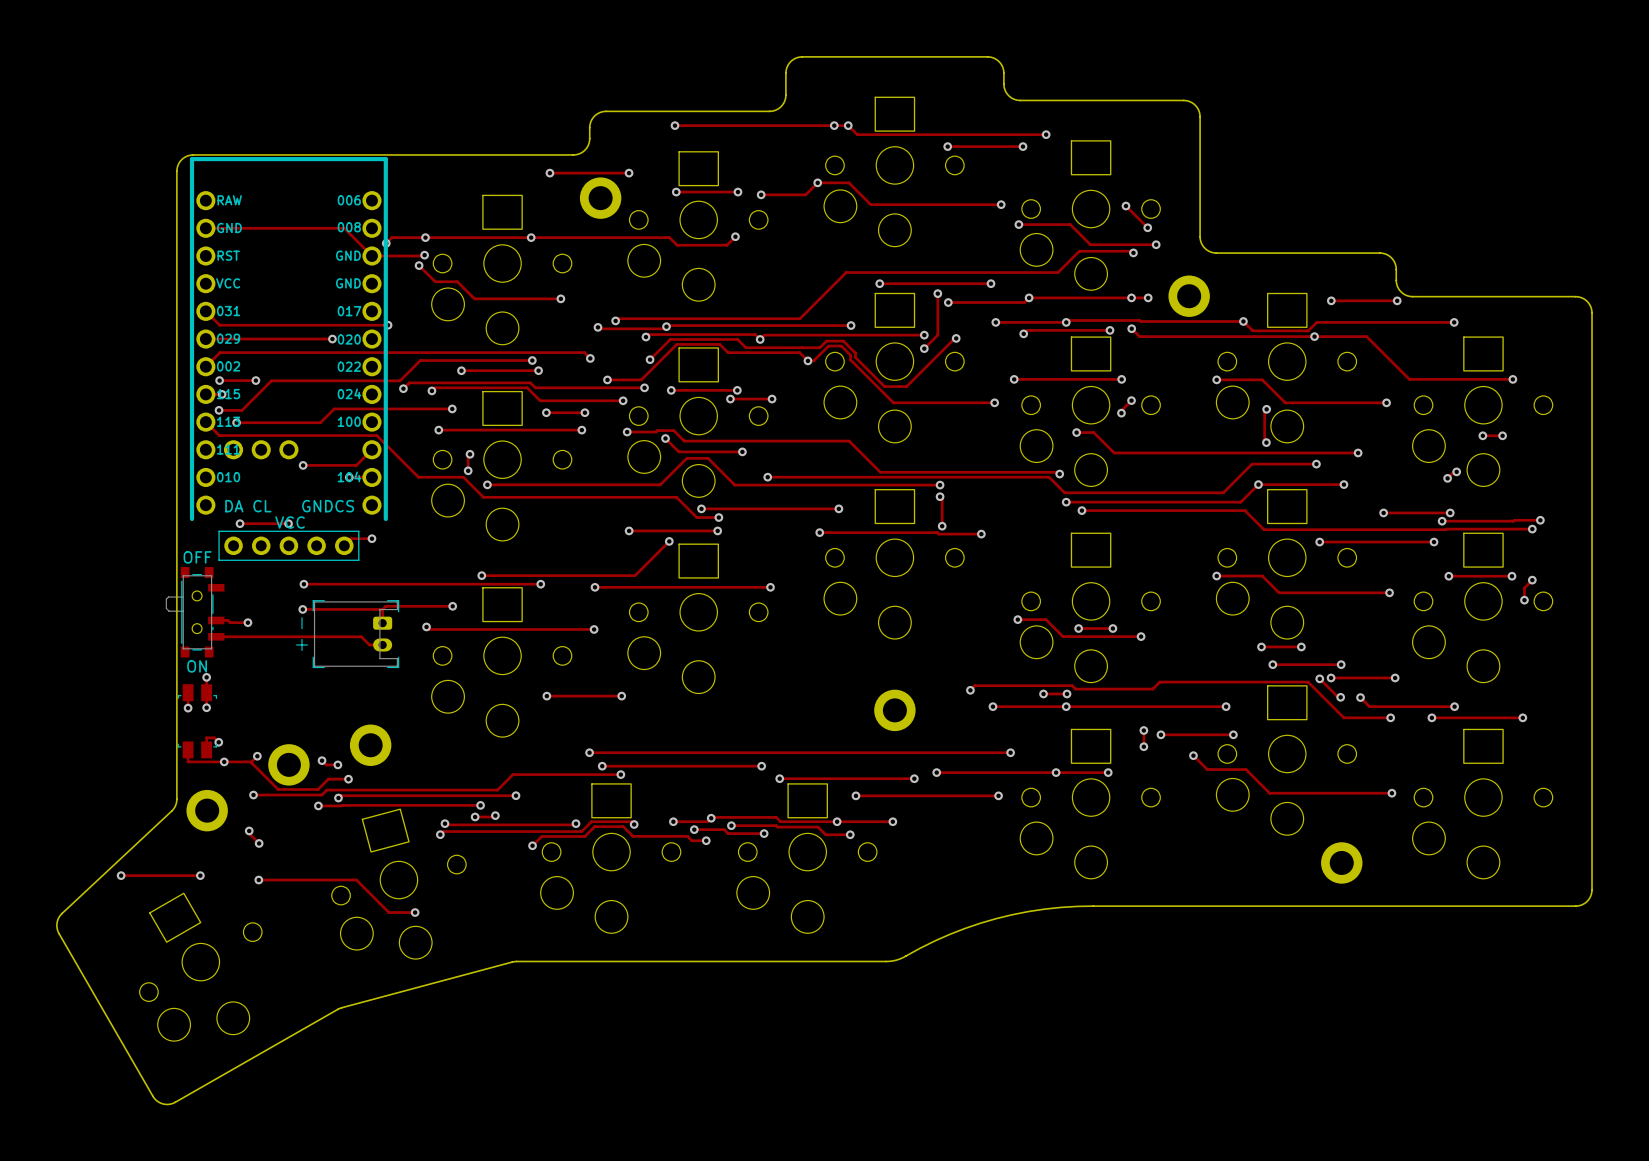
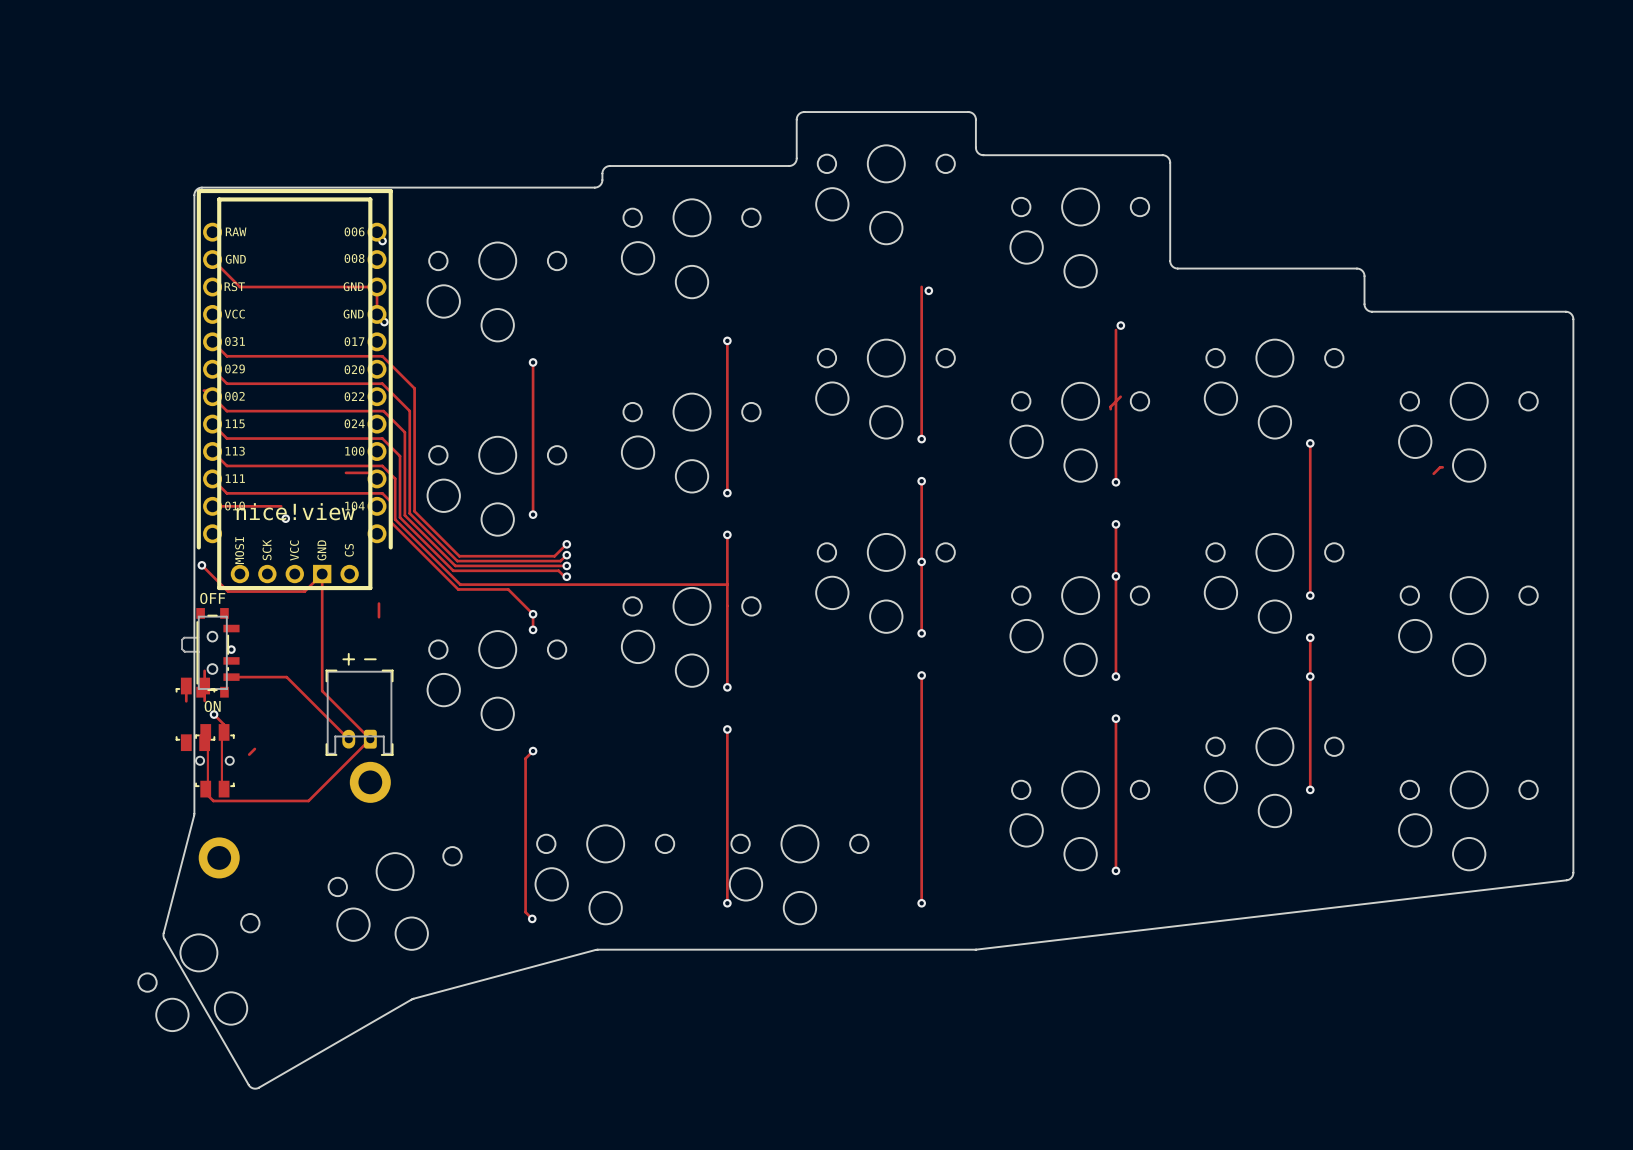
board edge: (802, 56) (989, 57) (995, 59) (1001, 65) (1005, 90) (1008, 95) (1016, 99) (1187, 101) (1195, 105) (1199, 114) (1200, 236) (1202, 244) (1208, 250) (1216, 253) (1382, 253) (1389, 256) (1394, 261) (1397, 286) (1402, 293) (1408, 296) (1575, 296) (1587, 301) (1592, 313) (1592, 889) (1589, 897) (1583, 903) (1575, 906) (1060, 907) (1028, 911) (980, 923) (935, 940) (899, 959) (889, 961) (514, 961) (339, 1008) (175, 1102) (167, 1104) (158, 1102) (152, 1096) (59, 933) (56, 924) (62, 913) (171, 811) (176, 802) (176, 171) (179, 163) (185, 157) (193, 154) (575, 154) (583, 151) (587, 146) (590, 121) (596, 114) (601, 111) (775, 110) (782, 104) (785, 99) (786, 71) (788, 65) (794, 59) (802, 56) -> (804, 112) (799, 113) (796, 117) (796, 159) (794, 163) (790, 165) (609, 166) (603, 170) (601, 184) (594, 187) (201, 187) (195, 191) (194, 813) (163, 935) (251, 1087) (259, 1087) (412, 999) (596, 949) (975, 949) (1566, 880) (1572, 876) (1573, 319) (1571, 313) (1565, 311) (1371, 311) (1364, 306) (1364, 275) (1358, 268) (1176, 268) (1170, 261) (1170, 162) (1165, 155) (982, 155) (976, 150) (975, 118) (970, 112) (804, 112)
part: (894, 114) -> none
track: (674, 125) (848, 125) (857, 134) (1046, 134) -> none
via: (674, 125) -> none
via: (834, 125) -> none
via: (848, 125) -> none
via: (1046, 134) -> none
track: (947, 146) (1023, 146) -> none
via: (947, 146) -> none
via: (1023, 146) -> none
part: (1091, 157) -> none
part: (698, 168) -> none
track: (549, 173) (629, 173) -> none
via: (549, 173) -> none
via: (629, 173) -> none
via: (817, 182) -> none
track: (676, 192) (737, 192) -> none
via: (676, 192) -> none
via: (737, 192) -> none
track: (761, 194) (805, 194) (817, 182) (848, 182) (870, 204) (1001, 204) -> none
via: (761, 194) -> none
part: (600, 198) -> none
via: (1001, 204) -> none
track: (1125, 206) (1147, 227) -> none
via: (1125, 206) -> none
part: (502, 212) -> none
track: (1018, 224) (1070, 224) (1090, 244) (1156, 244) -> none
via: (1018, 224) -> none
via: (1147, 227) -> none
track: (205, 228) (344, 228) (371, 256) (424, 255) -> none
track: (735, 236) (726, 245) (677, 245) (669, 237) (391, 237) (386, 243) -> none
via: (735, 236) -> none
via: (425, 237) -> none
via: (531, 237) -> none
via: (1156, 244) -> none
track: (1133, 252) (1131, 251) (1079, 251) (1058, 272) (846, 272) (799, 318) (617, 318) (615, 320) -> none
via: (1133, 252) -> none
via: (424, 255) -> none
track: none -> (212, 259) (239, 287) (377, 287) (377, 314)
track: (419, 265) (435, 281) (457, 281) (474, 298) (560, 298) -> none
via: (419, 265) -> none
track: (879, 283) (990, 283) -> none
via: (879, 283) -> none
via: (990, 283) -> none
track: none -> (921, 286) (921, 439)
track: (937, 293) (937, 335) (924, 348) -> none
part: (1189, 296) -> none
via: (1029, 297) -> none
via: (1131, 297) -> none
track: (1148, 297) (1029, 297) (1024, 302) (948, 302) -> none
via: (1148, 297) -> none
via: (560, 298) -> none
track: (1331, 300) (1397, 300) -> none
via: (1331, 300) -> none
via: (1397, 300) -> none
via: (948, 302) -> none
part: (894, 310) -> none
part: (1287, 310) -> none
track: (205, 311) (219, 325) (388, 325) -> none
via: (615, 320) -> none
via: (1243, 321) -> none
track: (995, 322) (1066, 322) (1068, 320) (1243, 321) (1252, 330) (1308, 330) (1316, 322) (1454, 322) -> none
via: (995, 322) -> none
via: (1066, 322) -> none
via: (1454, 322) -> none
track: (851, 325) (667, 325) (664, 328) (597, 327) -> none
via: (851, 325) -> none
via: (666, 326) -> none
via: (597, 327) -> none
track: (1131, 328) (1139, 336) (1366, 336) (1409, 379) (1512, 379) -> none
track: (1110, 330) (1027, 330) (1023, 333) -> none
via: (1110, 330) -> none
via: (1023, 333) -> none
track: none -> (1115, 330) (1115, 482)
track: (924, 335) (764, 335) (760, 339) (755, 334) (648, 334) (645, 337) -> none
via: (924, 335) -> none
via: (1314, 336) -> none
via: (645, 337) -> none
track: (956, 338) (906, 386) (884, 386) (855, 357) (855, 353) (843, 341) (826, 341) (819, 347) (745, 347) (737, 339) (670, 339) (650, 359) -> none
via: (956, 338) -> none
track: (205, 339) (332, 339) -> none
part: (288, 339) -> none
via: (332, 339) -> none
via: (760, 339) -> none
track: none -> (727, 340) (727, 493)
via: none -> (727, 340)
track: none -> (212, 341) (226, 356) (382, 356) (414, 388) (414, 511) (459, 556) (554, 556) (566, 544)
via: (924, 348) -> none
part: (1091, 353) -> none
part: (1483, 353) -> none
track: (590, 358) (584, 352) (220, 352) (205, 366) -> none
via: (590, 358) -> none
via: (650, 359) -> none
track: (532, 360) (420, 360) (400, 380) (271, 380) (241, 410) (219, 410) -> none
via: (532, 360) -> none
via: (807, 360) -> none
part: (698, 364) -> none
track: none -> (533, 362) (533, 514)
via: none -> (533, 362)
track: (461, 370) (538, 370) -> none
via: (461, 370) -> none
via: (538, 370) -> none
track: none -> (212, 369) (226, 383) (382, 383) (409, 411) (409, 513) (457, 561) (560, 561) (566, 555)
part: none -> (294, 369)
track: (607, 379) (641, 379) (676, 344) (719, 344) (728, 352) (799, 352) (807, 360) (813, 360) (828, 346) (841, 346) (850, 355) (850, 359) (893, 402) (994, 402) -> none
via: (607, 379) -> none
track: (1014, 379) (1121, 379) -> none
via: (1014, 379) -> none
via: (1121, 379) -> none
track: (1216, 379) (1262, 379) (1285, 402) (1386, 402) -> none
via: (1216, 379) -> none
via: (1512, 379) -> none
track: (219, 380) (255, 380) -> none
via: (219, 380) -> none
via: (255, 380) -> none
track: (644, 387) (535, 387) (530, 382) (409, 382) (403, 388) -> none
via: (644, 387) -> none
via: (403, 388) -> none
track: (431, 390) (434, 387) (527, 387) (540, 400) (623, 400) -> none
via: (431, 390) -> none
track: (671, 390) (737, 390) -> none
via: (671, 390) -> none
via: (737, 390) -> none
via: (222, 394) -> none
part: none -> (294, 393)
track: (730, 399) (772, 399) -> none
via: (730, 399) -> none
via: (772, 399) -> none
track: none -> (212, 396) (226, 411) (383, 411) (404, 432) (404, 515) (455, 565) (566, 565)
via: (623, 400) -> none
via: (1131, 400) -> none
via: (994, 402) -> none
via: (1386, 402) -> none
track: (452, 408) (334, 408) (320, 422) (236, 422) -> none
via: (452, 408) -> none
part: (502, 408) -> none
track: (1266, 409) (1264, 411) (1264, 440) (1266, 442) -> none
via: (1266, 409) -> none
via: (219, 410) -> none
track: (546, 412) (584, 412) -> none
via: (546, 412) -> none
via: (584, 412) -> none
via: (1121, 413) -> none
track: (205, 422) (219, 435) (376, 435) (418, 477) (463, 477) (483, 497) (676, 497) (696, 517) (718, 517) -> none
via: (236, 422) -> none
track: none -> (212, 424) (226, 438) (382, 438) (400, 456) (400, 517) (453, 570) (558, 570) (566, 576)
track: (438, 430) (581, 430) -> none
via: (438, 430) -> none
via: (581, 430) -> none
track: (627, 432) (673, 430) (684, 441) (849, 441) (880, 472) (1057, 472) (1059, 474) -> none
via: (627, 432) -> none
track: (1076, 432) (1093, 432) (1114, 452) (1358, 452) -> none
via: (1076, 432) -> none
track: (1482, 435) (1502, 435) -> none
via: (1482, 435) -> none
via: (1502, 435) -> none
track: (665, 438) (678, 451) (742, 451) -> none
via: (665, 438) -> none
via: (1266, 442) -> none
via: none -> (921, 439)
track: none -> (1310, 443) (1310, 595)
track: (371, 449) (356, 465) (303, 465) -> none
via: (742, 451) -> none
via: (1358, 452) -> none
track: (470, 454) (468, 456) (468, 470) -> none
via: (470, 454) -> none
track: none -> (212, 451) (226, 465) (382, 465) (395, 478) (395, 519) (460, 584) (727, 584)
track: (1316, 464) (1252, 464) (1223, 492) (1064, 492) (1049, 477) (767, 477) -> none
via position: (1316, 464) -> (1310, 443)
via: (303, 465) -> none
via: (468, 470) -> none
via: (1456, 471) -> none
via: (1059, 474) -> none
via: (349, 477) -> none
via: (767, 477) -> none
via: (1447, 478) -> none
track: none -> (212, 478) (226, 493) (382, 493) (390, 501) (390, 521) (458, 589) (508, 589) (533, 614) (533, 629)
track: (487, 484) (660, 484) (686, 458) (708, 458) (734, 485) (940, 485) -> none
via: (487, 484) -> none
via: (1258, 484) -> none
track: (1343, 484) (1258, 484) (1240, 502) (1066, 502) -> none
via: (1343, 484) -> none
track: none -> (921, 481) (921, 633)
via: none -> (921, 481)
via: (940, 485) -> none
via: none -> (1115, 482)
track: (940, 496) (942, 498) (942, 526) -> none
via: (940, 496) -> none
via: none -> (727, 493)
via: (1066, 502) -> none
part: (894, 506) -> none
part: (1287, 506) -> none
track: (701, 508) (838, 508) -> none
via: (701, 508) -> none
via: (838, 508) -> none
track: (1081, 510) (1244, 510) (1264, 529) (1532, 529) -> none
via: (1081, 510) -> none
track: none -> (212, 506) (281, 506)
track: (1383, 512) (1450, 512) -> none
via: (1383, 512) -> none
via: (1450, 512) -> none
via: (718, 517) -> none
via: none -> (533, 514)
track: (1540, 520) (1442, 521) -> none
via: (1540, 520) -> none
via: (1442, 521) -> none
track: (240, 523) (288, 523) -> none
via: (240, 523) -> none
via: (942, 526) -> none
track: none -> (1115, 524) (1115, 676)
via: none -> (1115, 524)
via: (1532, 529) -> none
track: (629, 530) (717, 530) -> none
via: (629, 530) -> none
via: (717, 530) -> none
track: (819, 532) (981, 534) -> none
via: (819, 532) -> none
via: (981, 534) -> none
track: (371, 538) (351, 538) (344, 545) -> none
via: (371, 538) -> none
track: none -> (727, 534) (727, 687)
via: none -> (727, 534)
track: (669, 541) (635, 575) (481, 575) -> none
via: (669, 541) -> none
track: (1319, 542) (1434, 542) -> none
via: (1319, 542) -> none
via: (1434, 542) -> none
part: (288, 545) -> none
via: none -> (566, 544)
part: (1091, 550) -> none
part: (1483, 550) -> none
via: none -> (566, 555)
part: (698, 561) -> none
via: none -> (921, 561)
track: none -> (201, 565) (228, 591) (304, 591) (322, 574) (322, 691) (370, 739) (308, 800) (213, 800) (205, 793) (207, 786) (207, 734) (205, 732)
via: none -> (201, 565)
via: none -> (566, 565)
via: (481, 575) -> none
track: (1216, 576) (1262, 576) (1279, 592) (1389, 592) -> none
via: (1216, 576) -> none
track: (1448, 576) (1512, 576) -> none
via: (1448, 576) -> none
via: (1512, 576) -> none
track: (1532, 580) (1524, 587) (1524, 600) -> none
via: (1532, 580) -> none
via: none -> (1115, 576)
via: none -> (566, 576)
track: (303, 584) (540, 584) -> none
via: (303, 584) -> none
via: (540, 584) -> none
track: (595, 587) (770, 587) -> none
via: (595, 587) -> none
via: (770, 587) -> none
via: (1389, 592) -> none
via: (1524, 600) -> none
via: none -> (1310, 595)
part: (502, 604) -> none
track: (452, 606) (385, 606) (382, 609) (302, 609) -> none
via: (452, 606) -> none
via: (302, 609) -> none
part position: (195, 612) -> (210, 652)
track: (1017, 619) (1045, 619) (1062, 636) (1141, 636) -> none
via: (1017, 619) -> none
track: (216, 620) (247, 622) -> none
via: none -> (533, 614)
via: (247, 622) -> none
track: (426, 626) (429, 629) (594, 629) -> none
via: (426, 626) -> none
track: (1078, 628) (1112, 628) -> none
via: (1078, 628) -> none
via: (1112, 628) -> none
via: (594, 629) -> none
part rotation: 0° (347, 634) -> 90° clockwise (359, 704)
part position: (347, 634) -> (359, 704)
via: none -> (533, 629)
track: (216, 636) (361, 636) (369, 644) (382, 644) -> none
via: (1141, 636) -> none
via: none -> (921, 633)
track: none -> (1310, 637) (1310, 789)
via: none -> (1310, 637)
track: (1261, 646) (1301, 646) -> none
via: (1261, 646) -> none
via: (1301, 646) -> none
via: none -> (231, 649)
track: (1272, 664) (1341, 664) -> none
via: (1272, 664) -> none
via: (1341, 664) -> none
via: (206, 677) -> none
track: (1331, 677) (1395, 677) -> none
via: (1331, 677) -> none
via: (1395, 677) -> none
track: (1319, 678) (1338, 697) (1340, 697) -> none
via: (1319, 678) -> none
track: none -> (921, 675) (921, 903)
via: none -> (921, 675)
track: none -> (231, 677) (286, 677) (348, 739)
via: none -> (1115, 676)
via: none -> (1310, 676)
track: (970, 690) (975, 685) (1072, 685) (1075, 689) (1152, 689) (1159, 682) (1308, 682) (1343, 717) (1390, 717) -> none
via: (970, 690) -> none
track: (1043, 693) (1067, 693) -> none
via: (1043, 693) -> none
via: (1067, 693) -> none
via: none -> (727, 687)
track: (546, 696) (621, 696) -> none
via: (546, 696) -> none
via: (621, 696) -> none
via: (1340, 697) -> none
track: (1360, 697) (1369, 706) (1454, 706) -> none
via: (1360, 697) -> none
part: (1287, 702) -> none
track: (992, 706) (1226, 706) -> none
via: (992, 706) -> none
via: (1066, 706) -> none
via: (1226, 706) -> none
via: (1454, 706) -> none
via: (206, 707) -> none
via: (188, 708) -> none
part: (894, 710) -> none
via: (1390, 717) -> none
track: (1431, 717) (1522, 717) -> none
via: (1431, 717) -> none
via: (1522, 717) -> none
track: none -> (214, 714) (224, 724) (224, 732) (221, 734) (221, 786) (224, 789)
via: none -> (214, 714)
track: none -> (1115, 718) (1115, 870)
via: none -> (1115, 718)
track: (1143, 730) (1143, 746) -> none
via: (1143, 730) -> none
track: (1160, 734) (1233, 734) -> none
via: (1160, 734) -> none
via: (1233, 734) -> none
track: none -> (727, 729) (727, 903)
via: none -> (727, 729)
track: (218, 742) (214, 737) (206, 737) (206, 749) -> none
via: (218, 742) -> none
part: (370, 745) -> none
part: (1091, 746) -> none
via: (1143, 746) -> none
part: (1483, 746) -> none
track: (188, 749) (188, 761) (251, 761) (278, 789) (318, 789) (328, 779) (348, 779) -> none
track: (589, 752) (1010, 752) -> none
via: (589, 752) -> none
via: (1010, 752) -> none
track: (1193, 755) (1207, 769) (1245, 769) (1269, 793) (1391, 793) -> none
via: (1193, 755) -> none
via: (257, 756) -> none
track: none -> (533, 751) (525, 758) (525, 912) (532, 918)
via: none -> (533, 751)
track: (322, 760) (326, 764) (337, 764) -> none
via: (322, 760) -> none
via: (224, 761) -> none
part: (288, 764) -> none
via: (337, 764) -> none
track: (602, 766) (761, 766) -> none
via: (602, 766) -> none
via: (761, 766) -> none
part: none -> (214, 760)
track: (936, 772) (1108, 772) -> none
via: (936, 772) -> none
via: (1056, 772) -> none
via: (1108, 772) -> none
track: (620, 774) (513, 774) (497, 790) (326, 790) (321, 795) (253, 795) -> none
via: (620, 774) -> none
track: (779, 778) (914, 778) -> none
via: (779, 778) -> none
via: (914, 778) -> none
via: (348, 779) -> none
part: none -> (370, 782)
via: (1391, 793) -> none
via: (253, 795) -> none
track: (515, 795) (340, 795) (338, 798) -> none
via: (515, 795) -> none
track: (855, 795) (998, 795) -> none
via: (855, 795) -> none
via: (998, 795) -> none
via: none -> (1310, 789)
via: (338, 798) -> none
part: (611, 800) -> none
part: (807, 800) -> none
via: (318, 805) -> none
track: (480, 805) (318, 805) -> none
via: (480, 805) -> none
part position: (207, 810) -> (219, 857)
track: (495, 815) (475, 816) -> none
via: (495, 815) -> none
via: (475, 816) -> none
via: (711, 818) -> none
track: (673, 821) (707, 821) (712, 817) (776, 817) (780, 821) (892, 821) -> none
via: (673, 821) -> none
via: (837, 821) -> none
via: (892, 821) -> none
track: (444, 823) (575, 823) -> none
via: (444, 823) -> none
via: (575, 823) -> none
track: (634, 824) (631, 821) (591, 821) (581, 831) (443, 831) (440, 834) -> none
via: (634, 824) -> none
track: (731, 825) (818, 827) (825, 834) (850, 834) -> none
via: (731, 825) -> none
track: (694, 829) (724, 829) (728, 833) (764, 833) -> none
via: (694, 829) -> none
track: (249, 830) (249, 833) (259, 843) -> none
via: (249, 830) -> none
part: (385, 830) -> none
via: (764, 833) -> none
via: (440, 834) -> none
via: (850, 834) -> none
track: (706, 840) (691, 840) (687, 836) (632, 836) (623, 826) (594, 826) (584, 836) (541, 836) (532, 845) -> none
via: (706, 840) -> none
via: (259, 843) -> none
via: (532, 845) -> none
part: (1341, 862) -> none
track: (121, 875) (200, 875) -> none
via: (121, 875) -> none
via: (200, 875) -> none
via: none -> (1115, 870)
track: (258, 880) (356, 880) (388, 912) (415, 912) -> none
via: (258, 880) -> none
via: (415, 912) -> none
via: none -> (727, 903)
via: none -> (921, 903)
part: (175, 917) -> none
via: none -> (532, 918)

